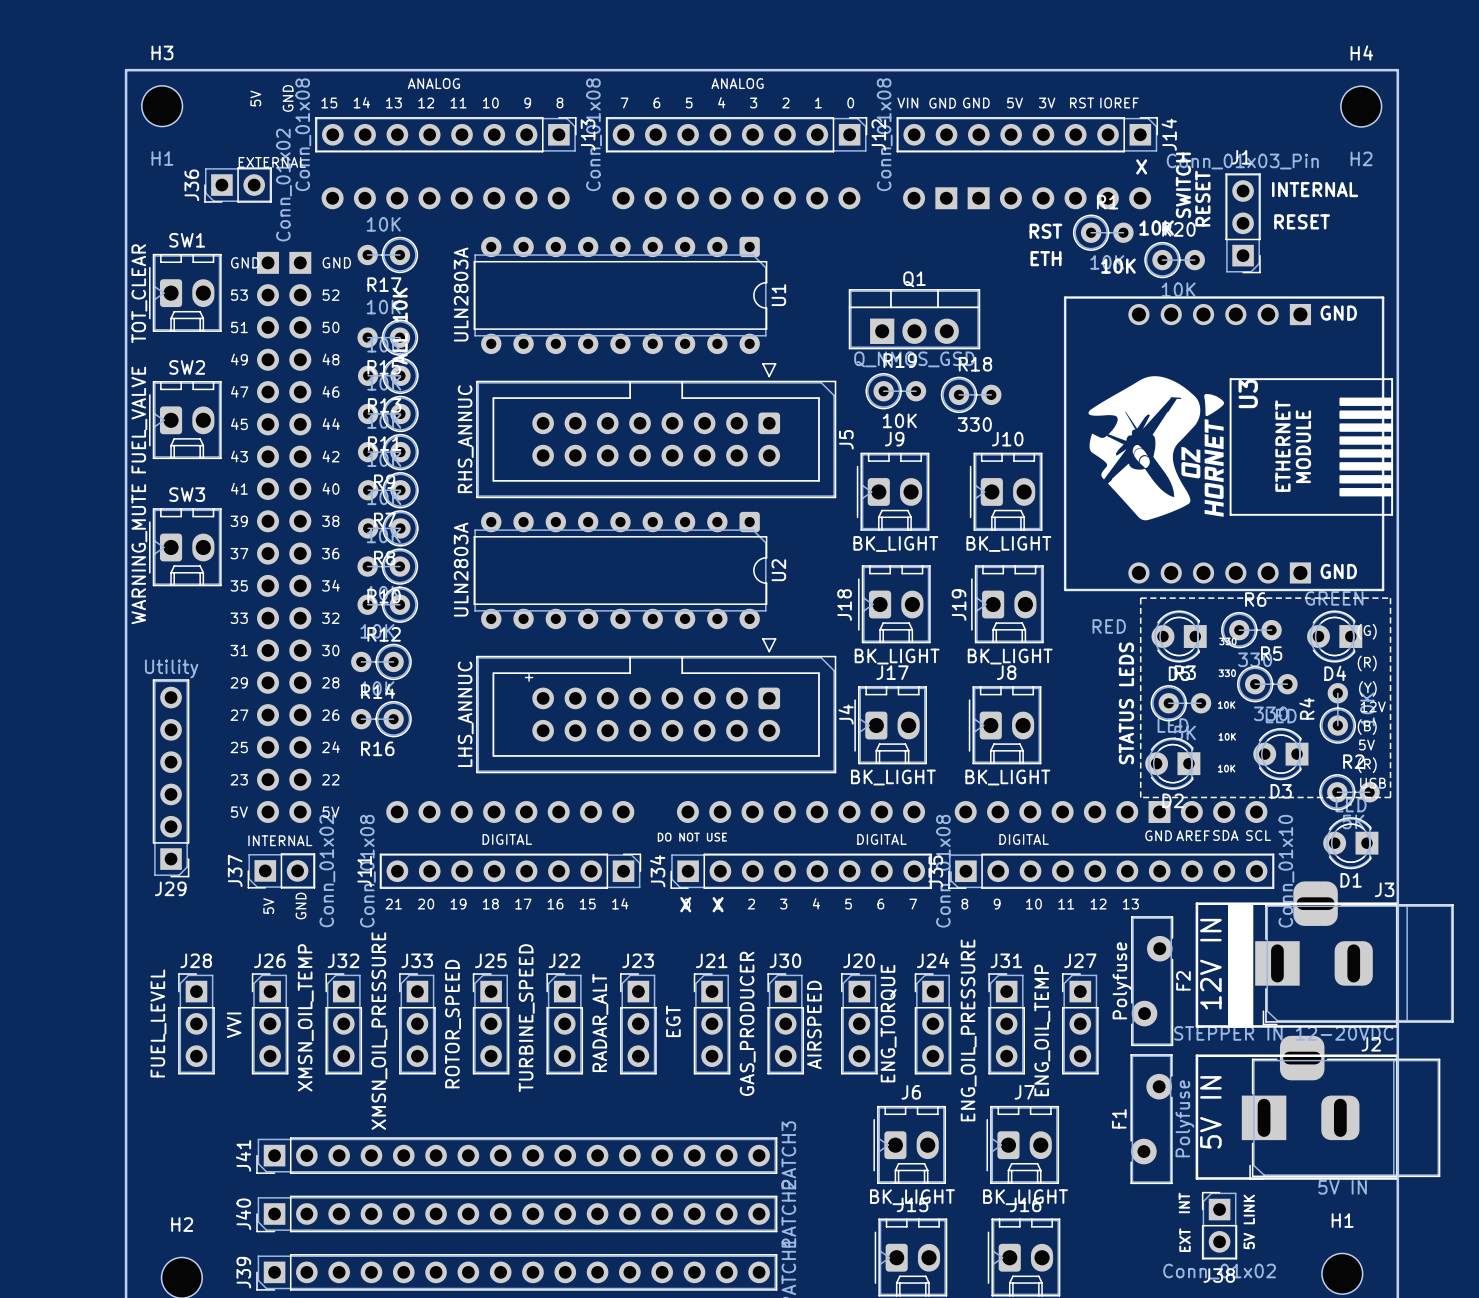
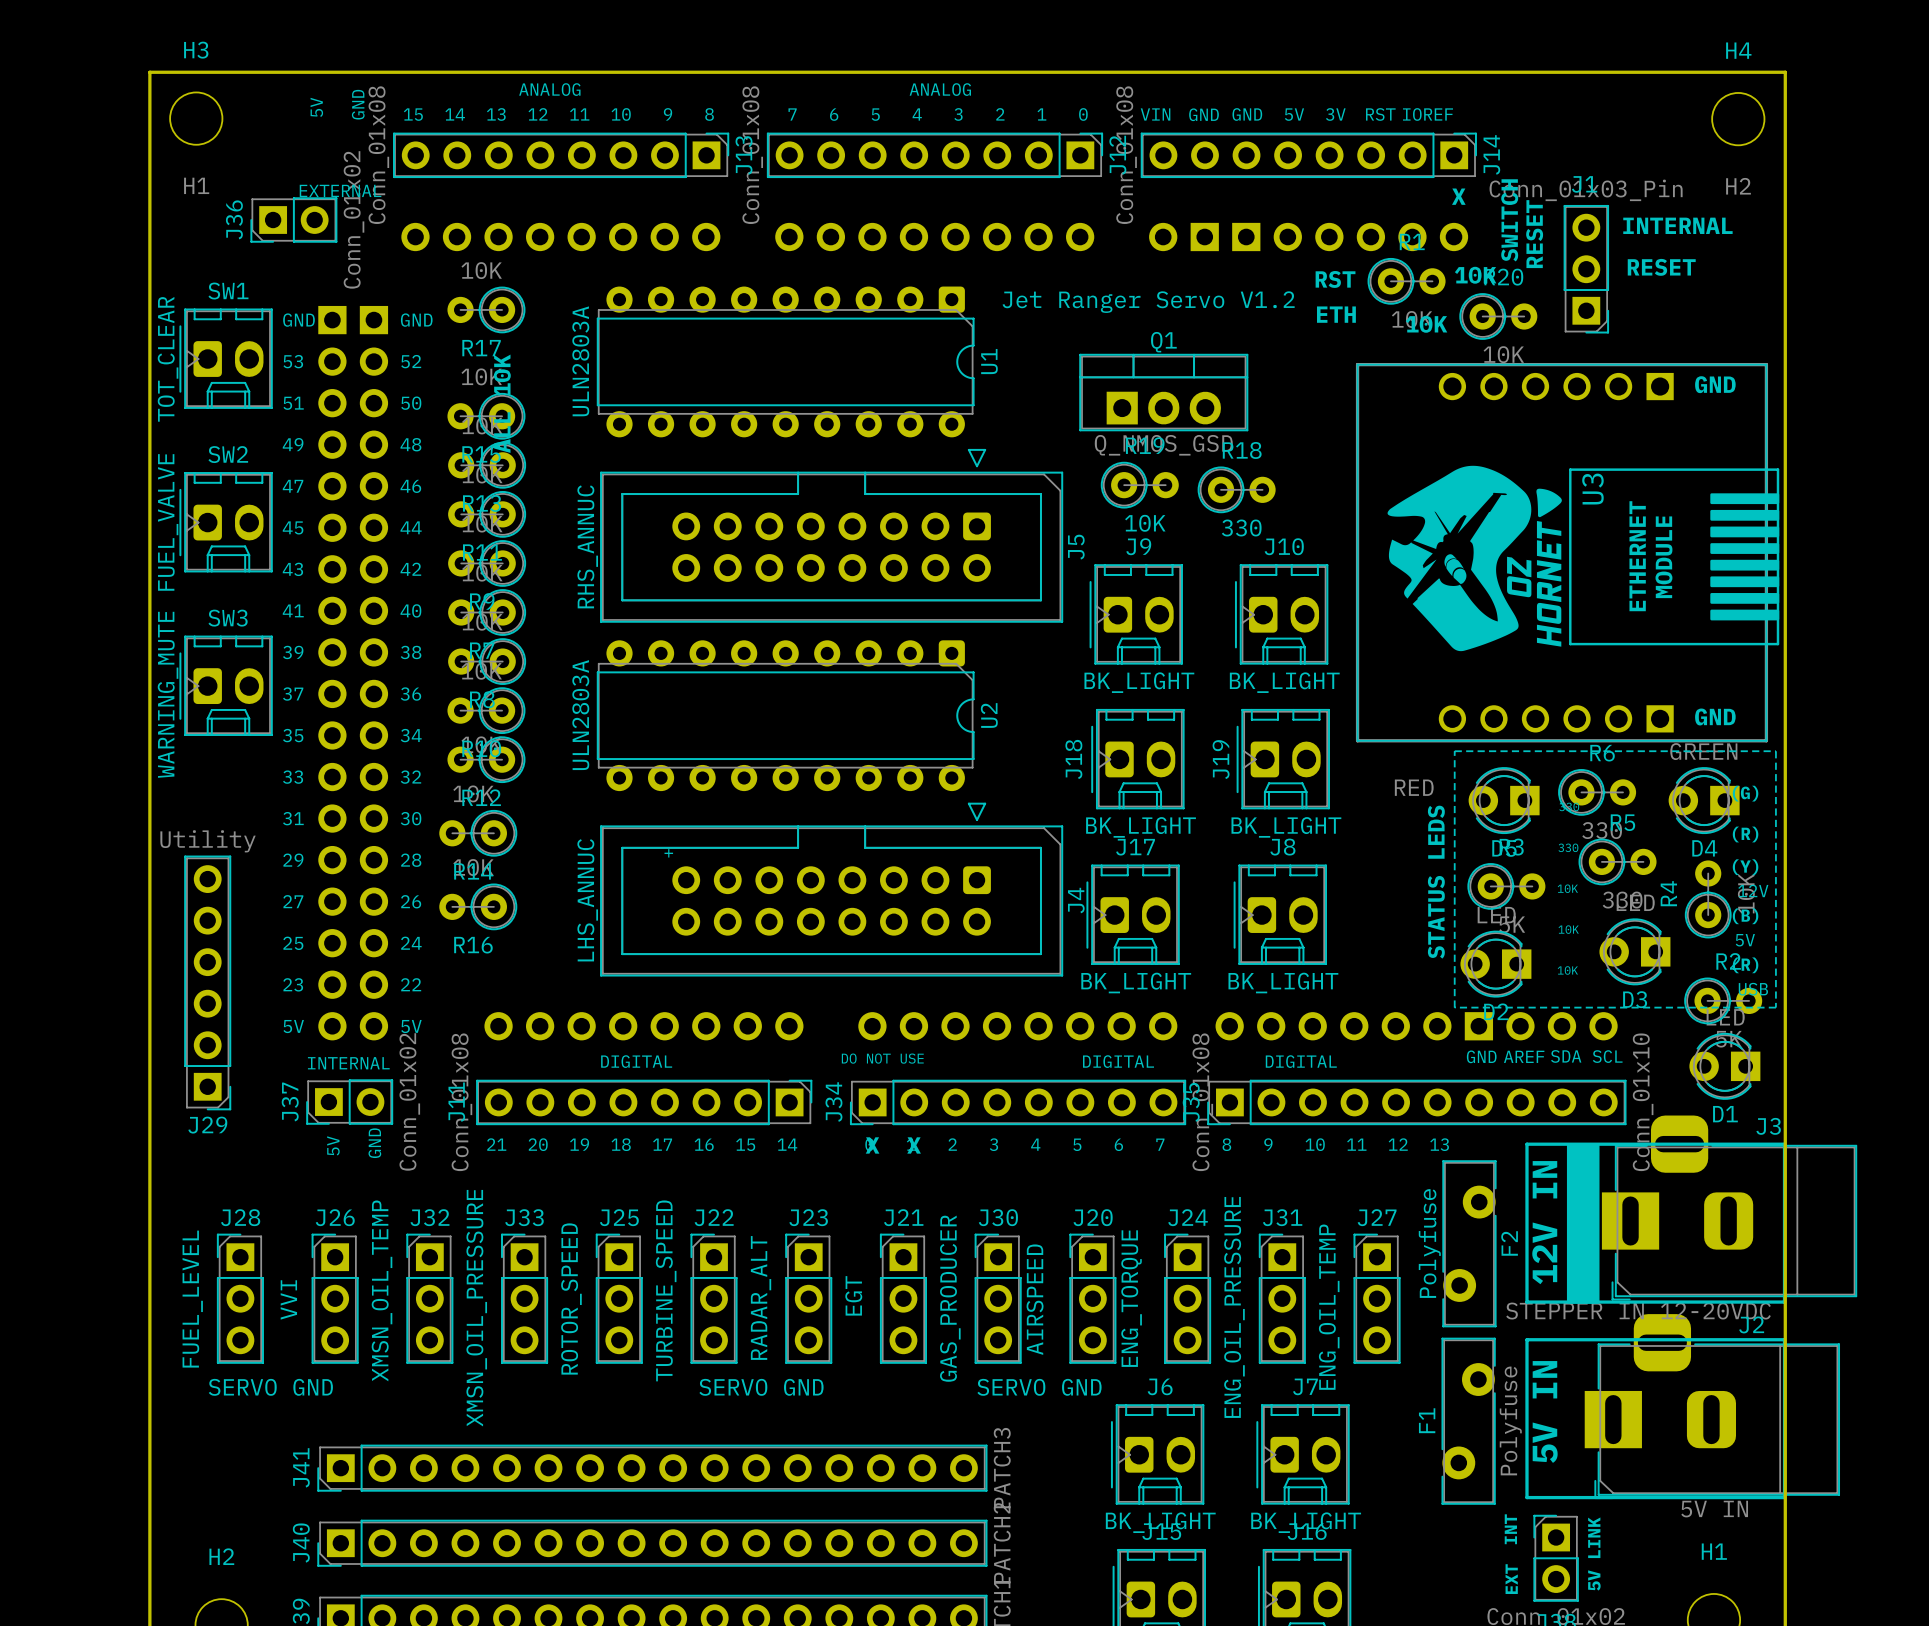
text: none -> Jet Ranger Servo V1.2 (1148, 302)
text: none -> SERVO GND (270, 1387)
text: none -> SERVO GND (761, 1387)
text: none -> SERVO GND (1039, 1387)

